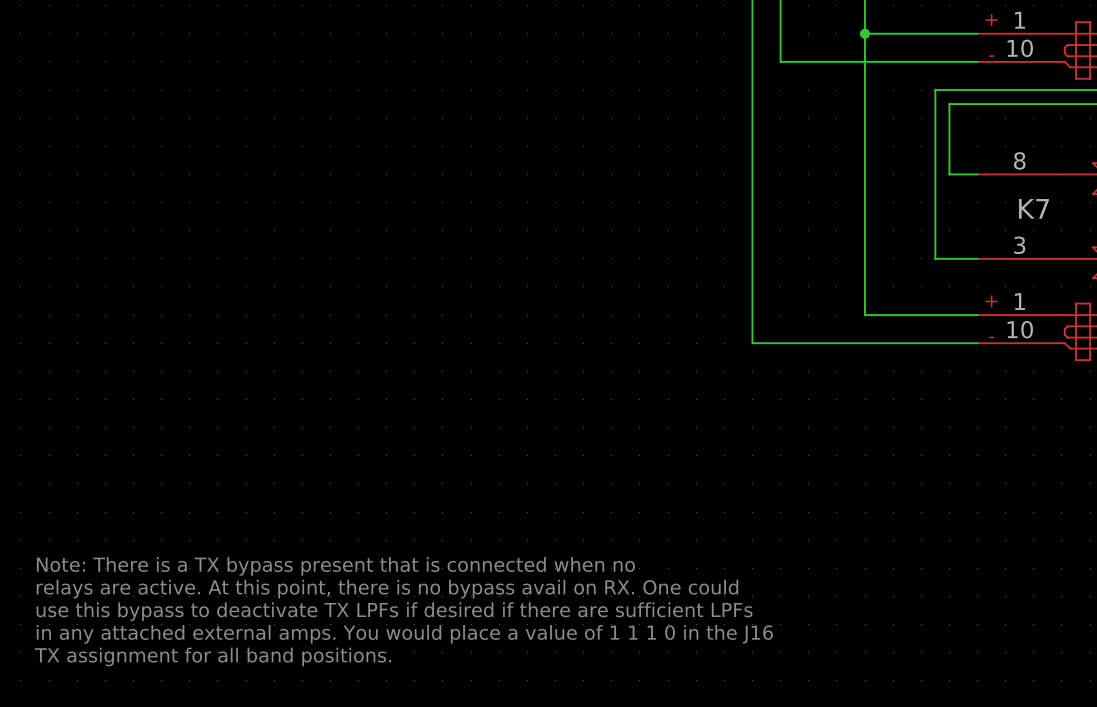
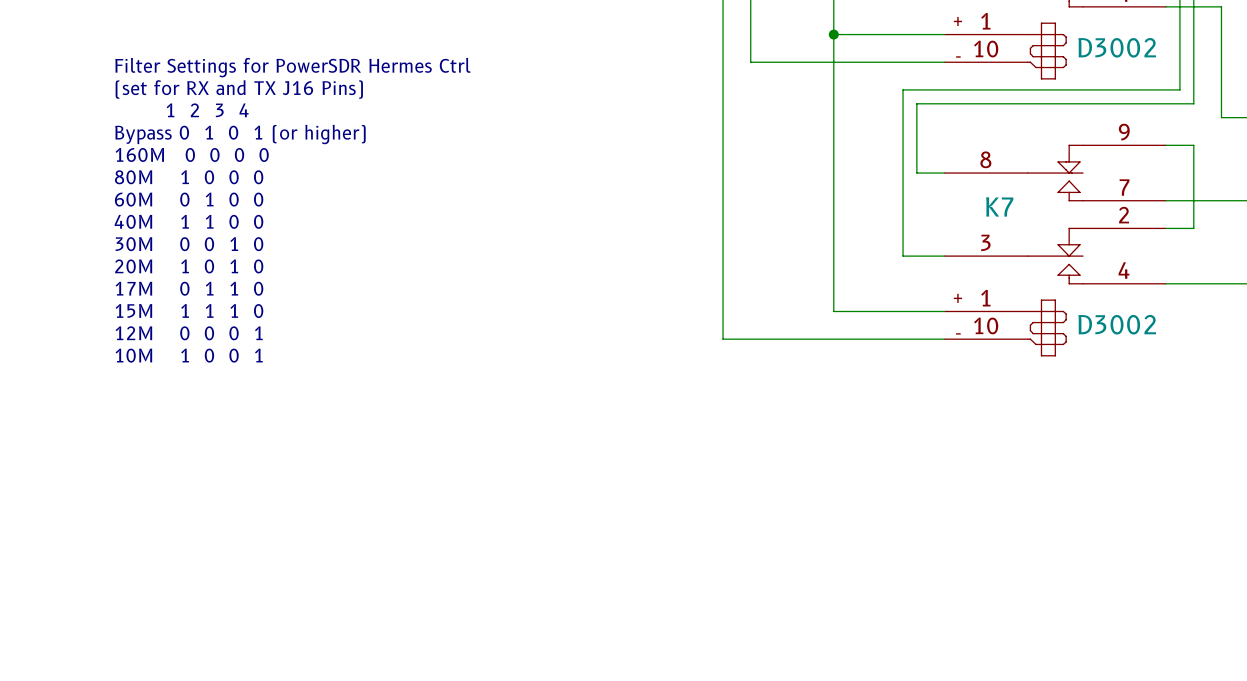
text: none -> Filter Settings for PowerSDR Hermes Ctrl (292, 67)
text: none -> (set for RX and TX J16 Pins) (239, 89)
text: none -> 1 2 3 4 (207, 110)
text: none -> Bypass 0 1 0 1 (or higher) (240, 134)
text: none -> 160M 0 0 0 0 (192, 154)
text: none -> 80M 1 0 0 0 (189, 177)
text: none -> 60M 0 1 0 0 (189, 199)
text: none -> 40M 1 1 0 0 (189, 221)
text: none -> 30M 0 0 1 0 (189, 244)
text: none -> 20M 1 0 1 0 (189, 266)
text: none -> 17M 0 1 1 0 (189, 288)
text: none -> 15M 1 1 1 0 (189, 311)
text: none -> 12M 0 0 0 1 (189, 333)
text: none -> 10M 1 0 0 1 (189, 355)
text: Note: There is a TX bypass present that is connected when no (335, 566) -> none
text: relays are active. At this point, there is no bypass avail on RX. One could (387, 589) -> none
text: use this bypass to deactivate TX LPFs if desired if there are sufficient LPFs (394, 611) -> none
text: in any attached external amps. You would place a value of 1 1 1 0 in the J16 (404, 634) -> none
text: TX assignment for all band positions. (213, 656) -> none

